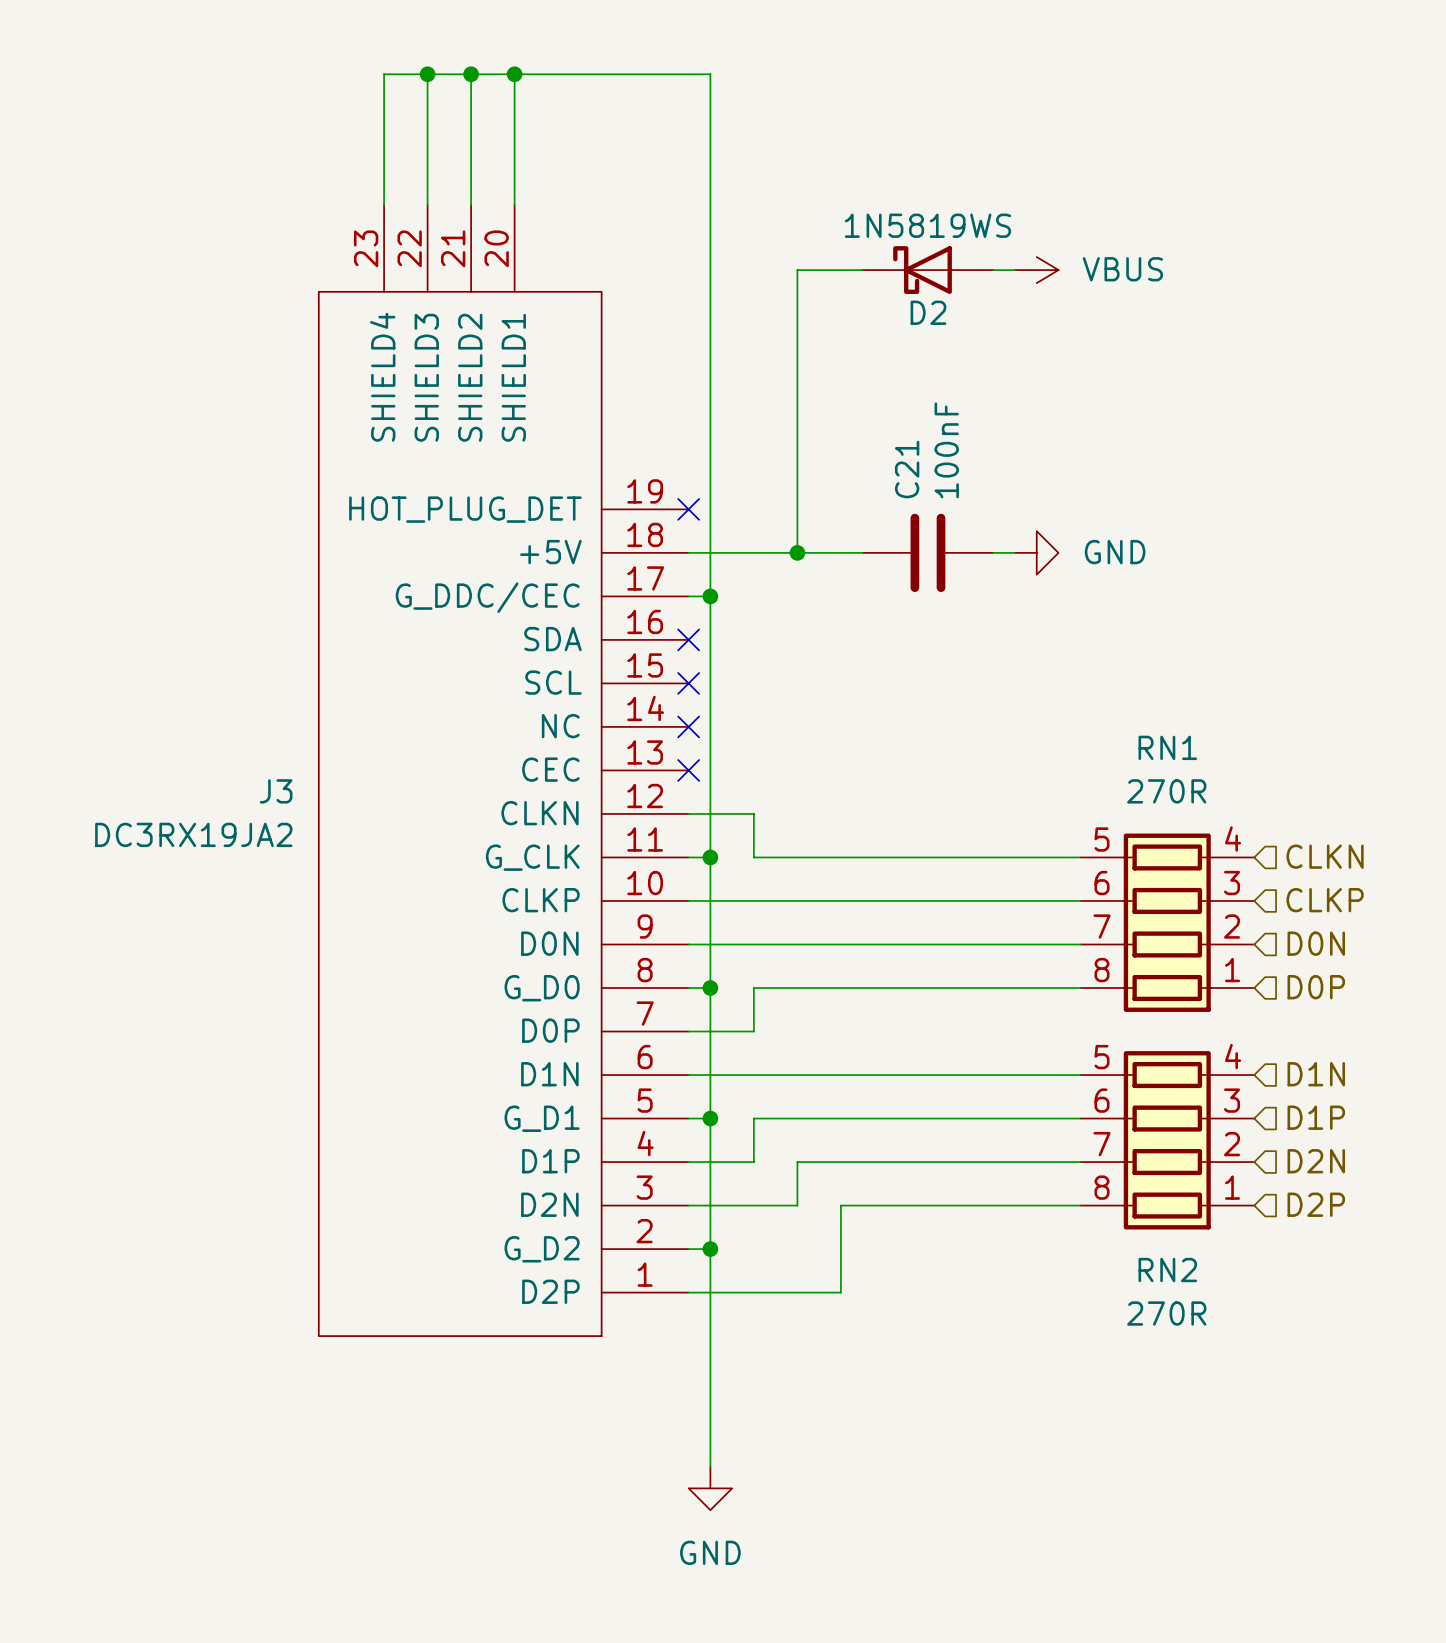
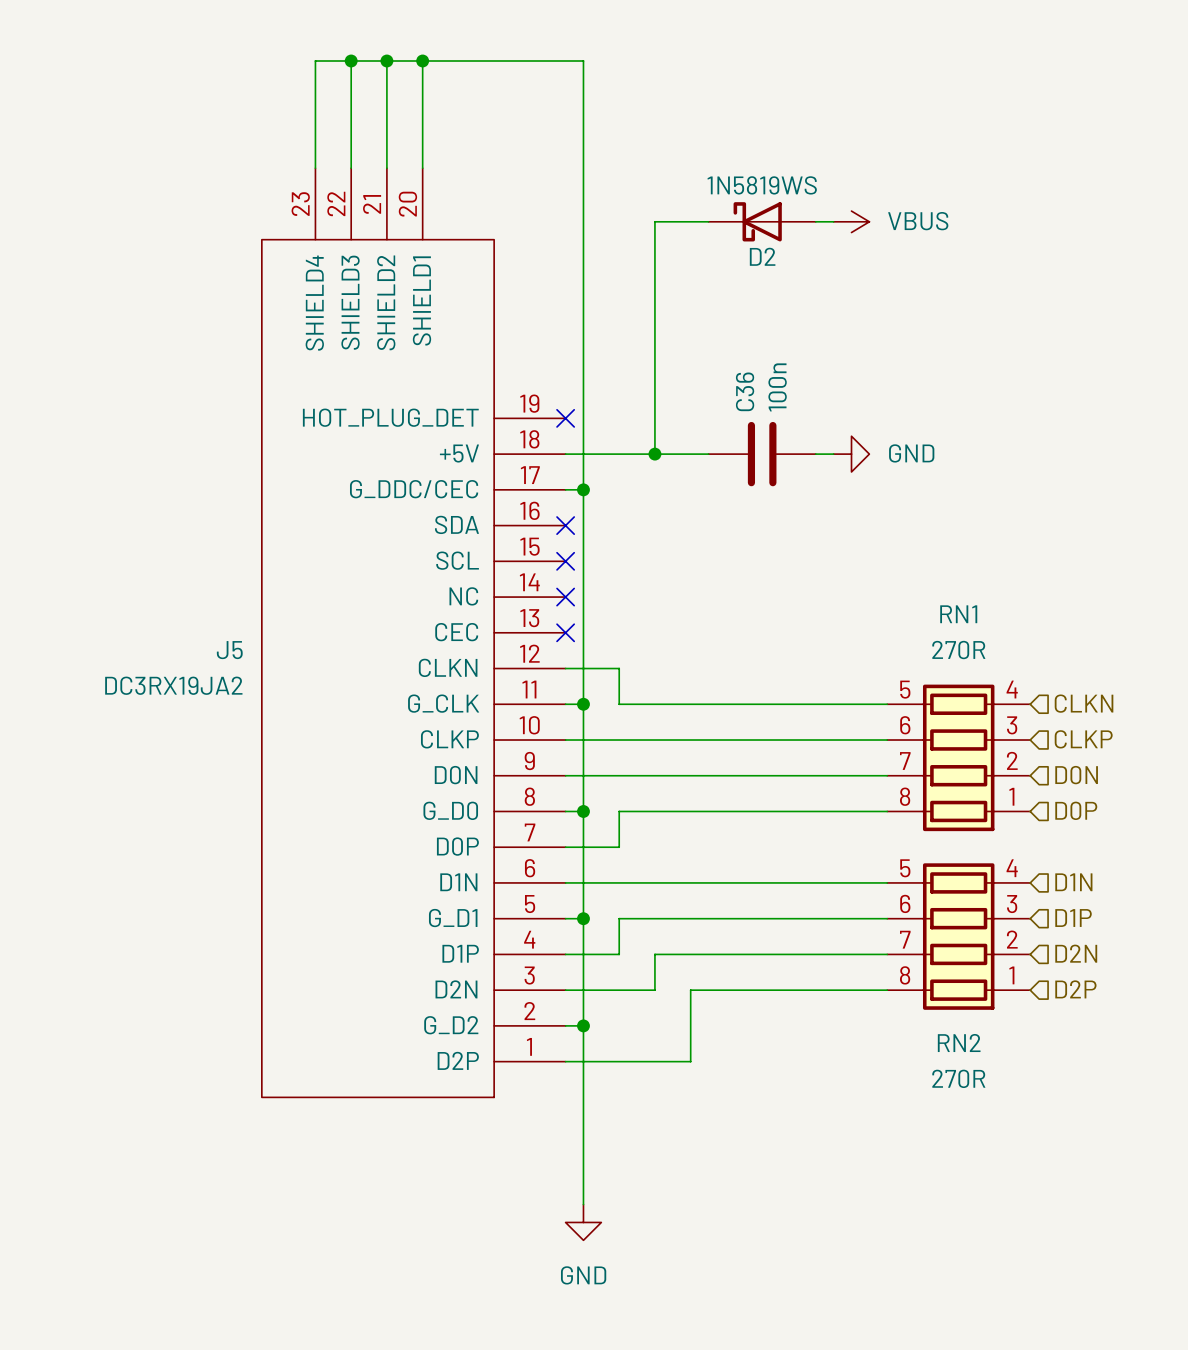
C21 value: 100nF (946, 450) -> 100n (777, 387)
C21 name: C21 (907, 469) -> C36 (745, 391)
J3 name: J3 (276, 791) -> J5 (229, 650)

